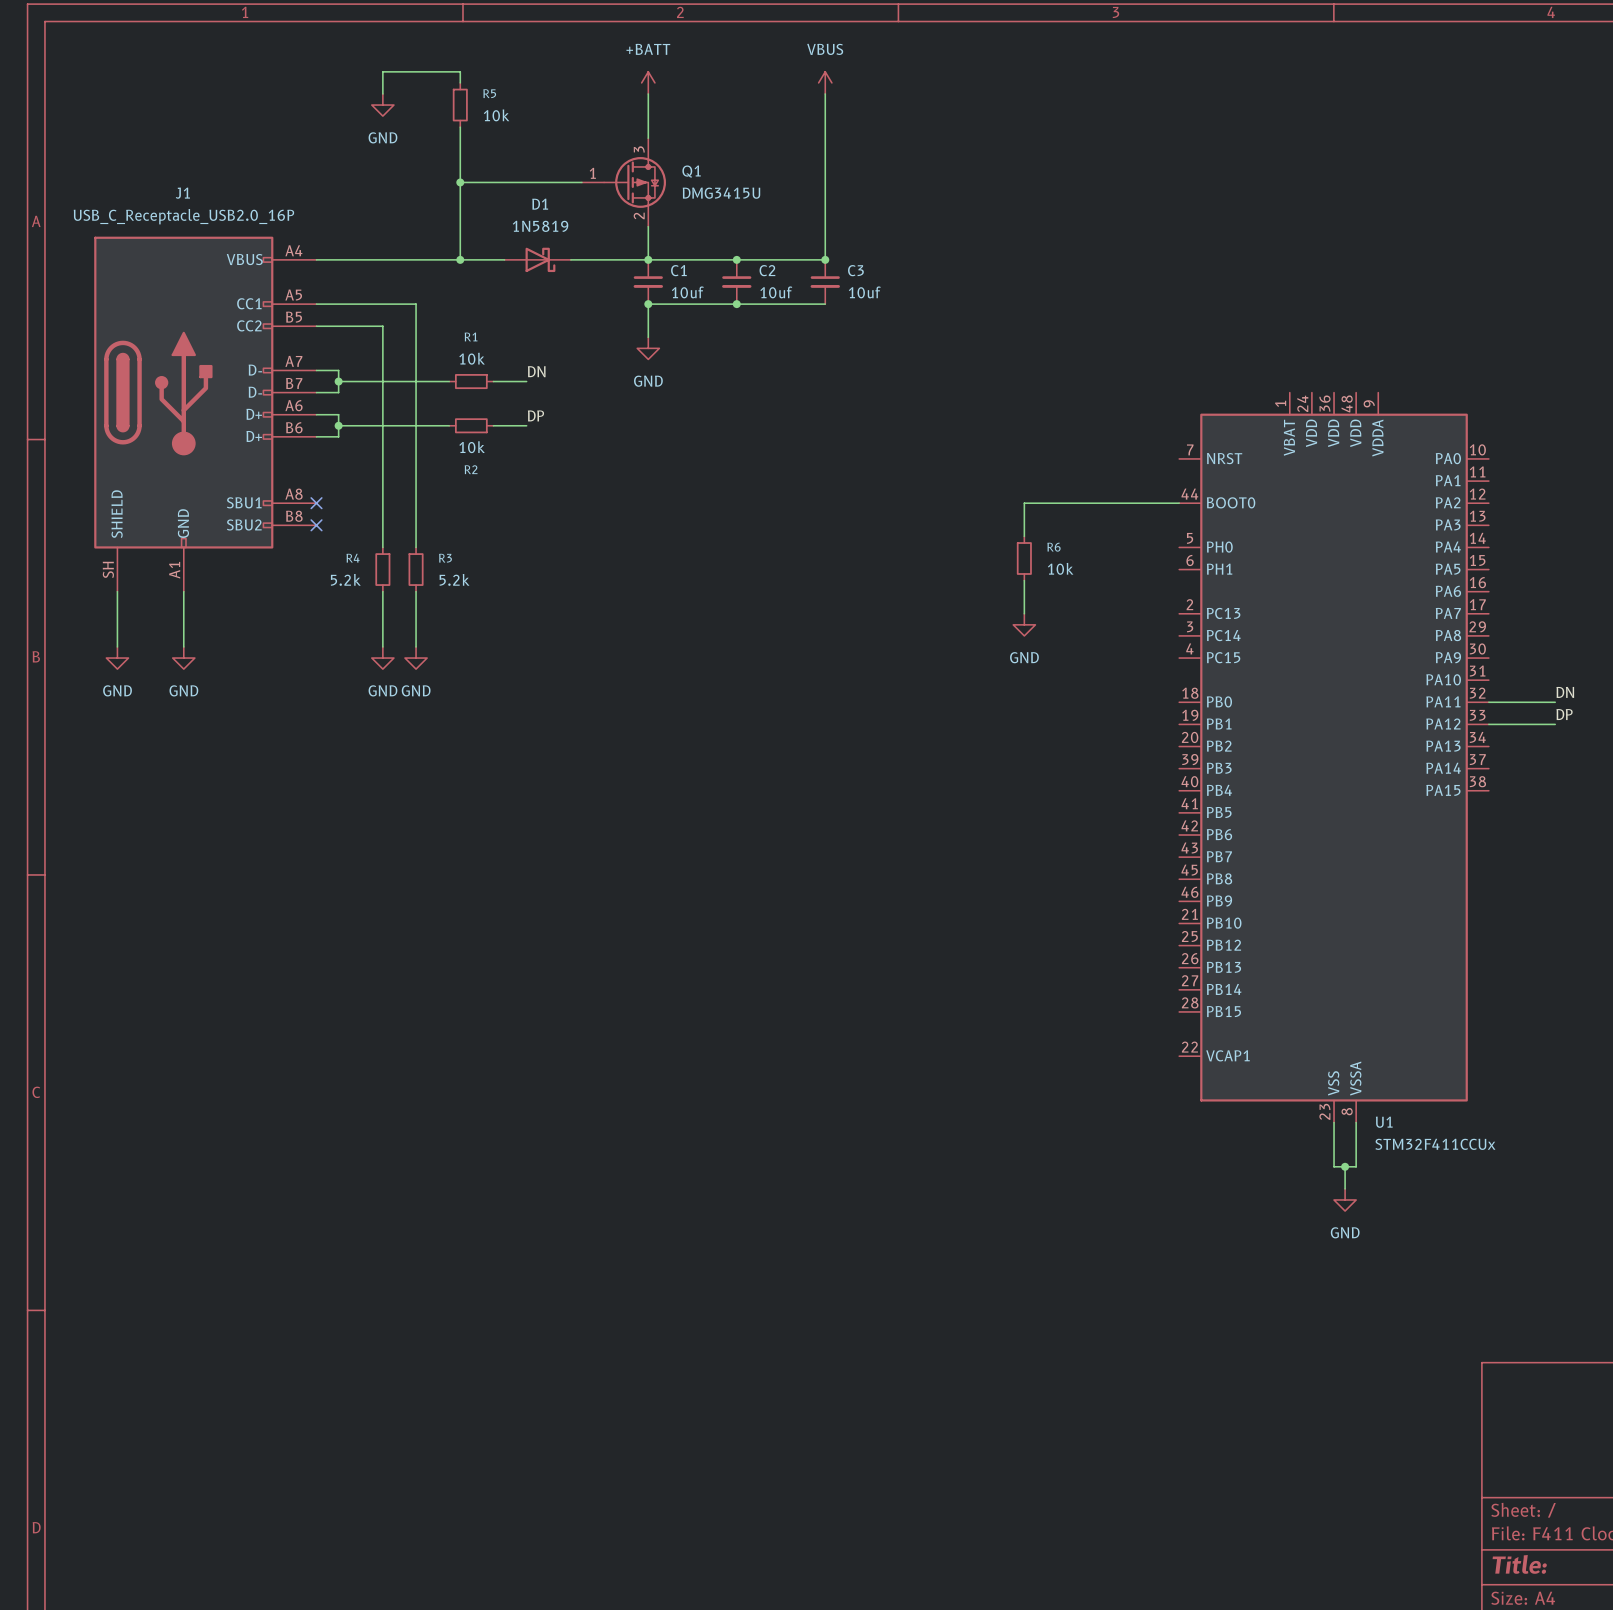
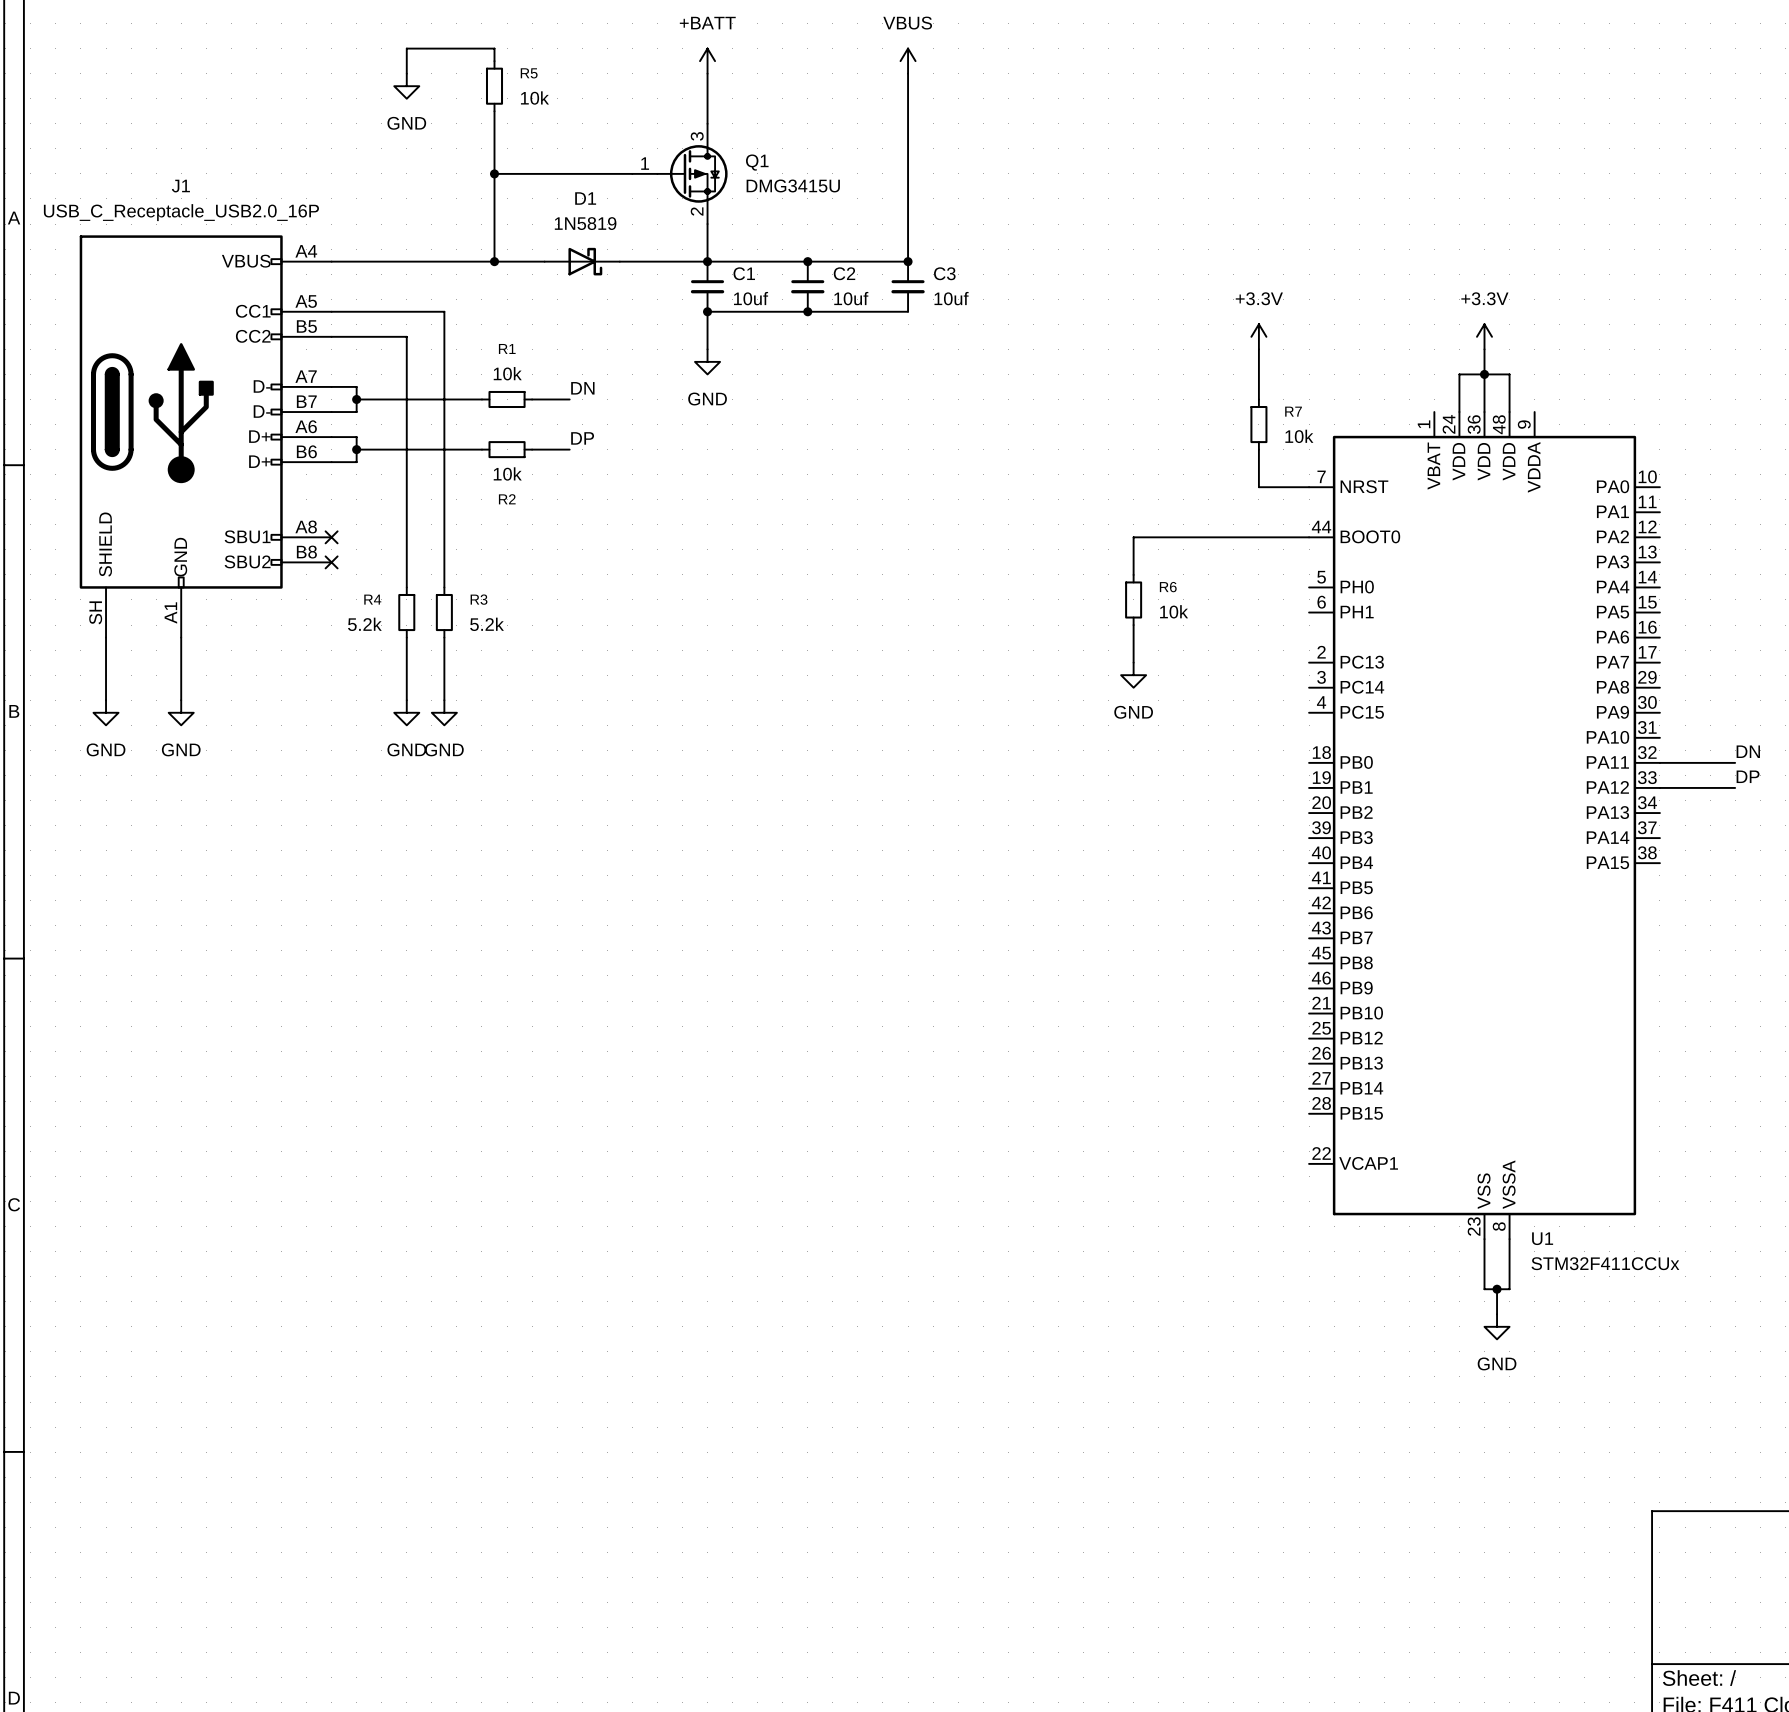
power symbol: none -> +3.3V (1258, 336)
power symbol: none -> +3.3V (1484, 336)
wire: none -> (1258, 349) (1258, 399)
wire: none -> (1484, 349) (1484, 412)
junction: none -> (1484, 374)
wire: none -> (1459, 412) (1459, 374) (1509, 374) (1509, 412)
R7: none -> 10k (1258, 424)
wire: none -> (1258, 449) (1258, 487) (1309, 487)

